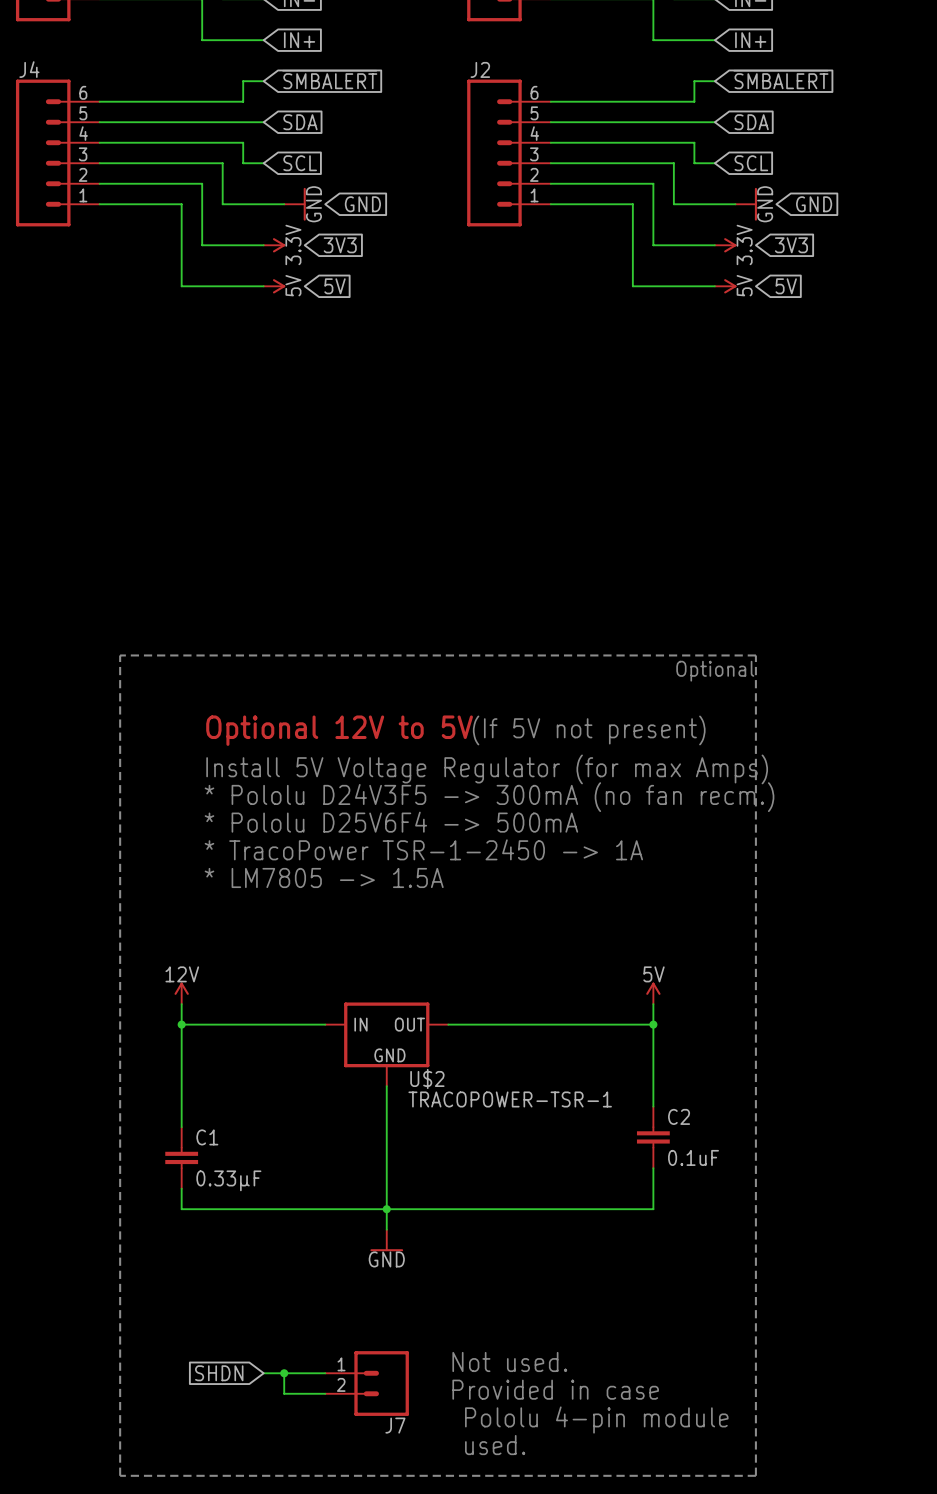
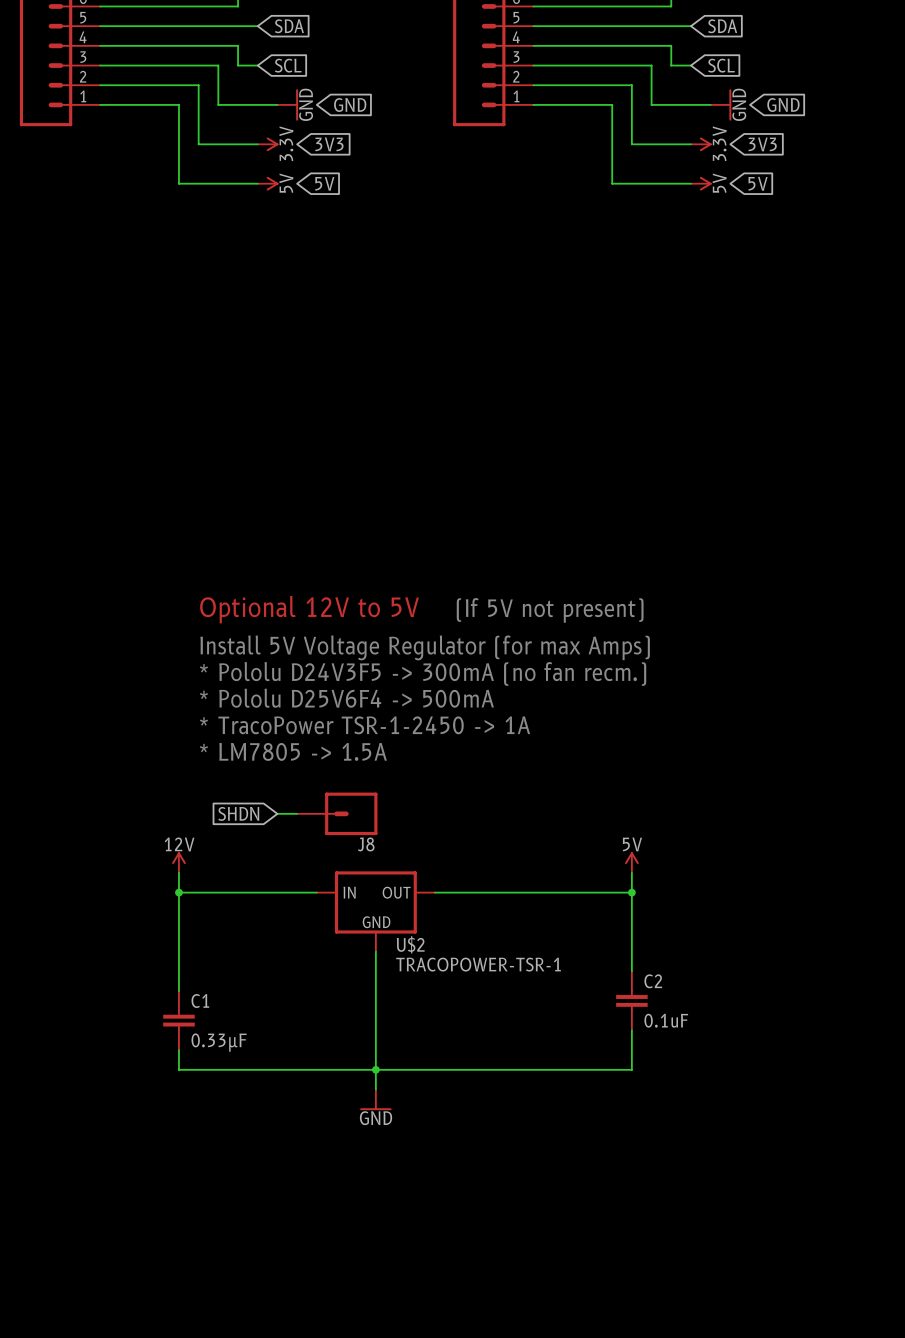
line: (120, 655) (755, 655) (755, 1475) (120, 1475) (120, 655) -> none
text: Optional (715, 671) -> none
global label: none -> SHDN (238, 813)
wire: none -> (277, 813) (297, 813)
J8: none -> (337, 813)
text: Not used. (509, 1361) -> none
global label: SHDN (219, 1373) -> none
wire: (263, 1373) (325, 1373) -> none
wire: (284, 1373) (284, 1393) (325, 1393) -> none
junction: (284, 1373) -> none
J7: (367, 1383) -> none
text: Provided in case (555, 1389) -> none
text: Pololu 4-pin module (596, 1420) -> none
text: used. (495, 1445) -> none

